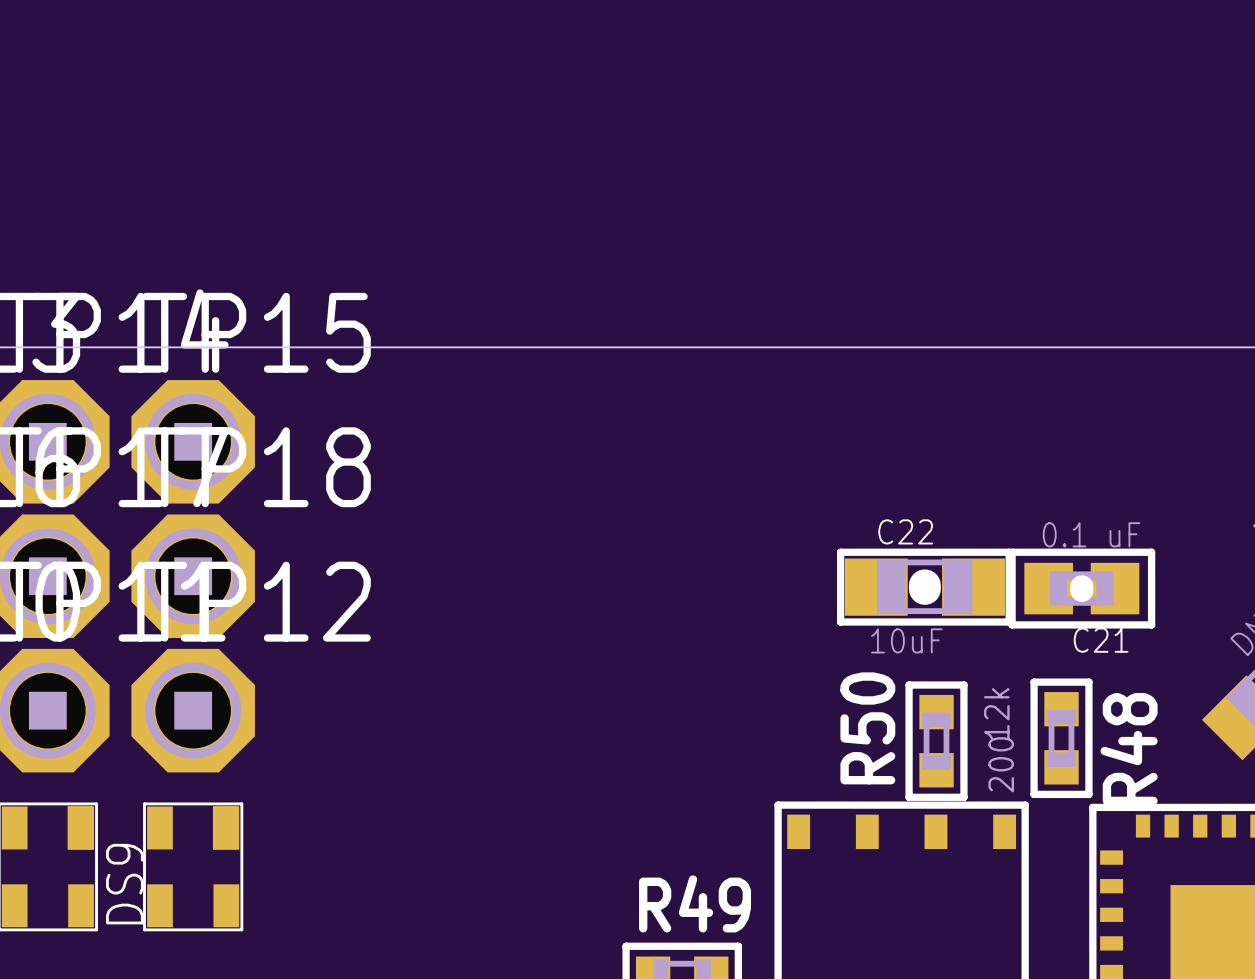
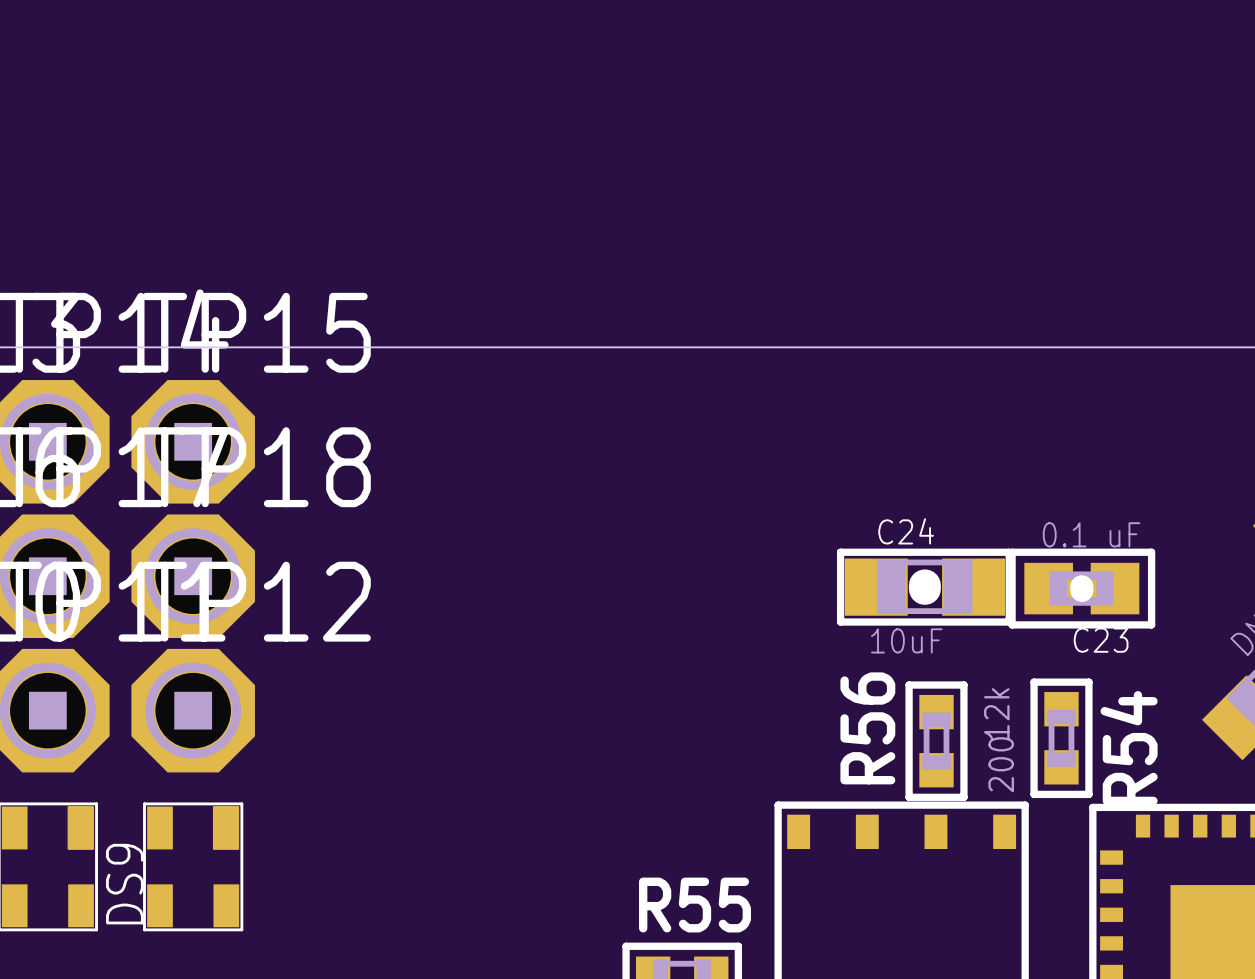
C22 name: C22 (905, 531) -> C24 (906, 531)
C21 name: C21 (1101, 640) -> C23 (1101, 640)
R50 name: R50 (867, 728) -> R56 (867, 728)
R48 name: R48 (1129, 749) -> R54 (1129, 748)
R49 name: R49 (694, 903) -> R55 (694, 905)

